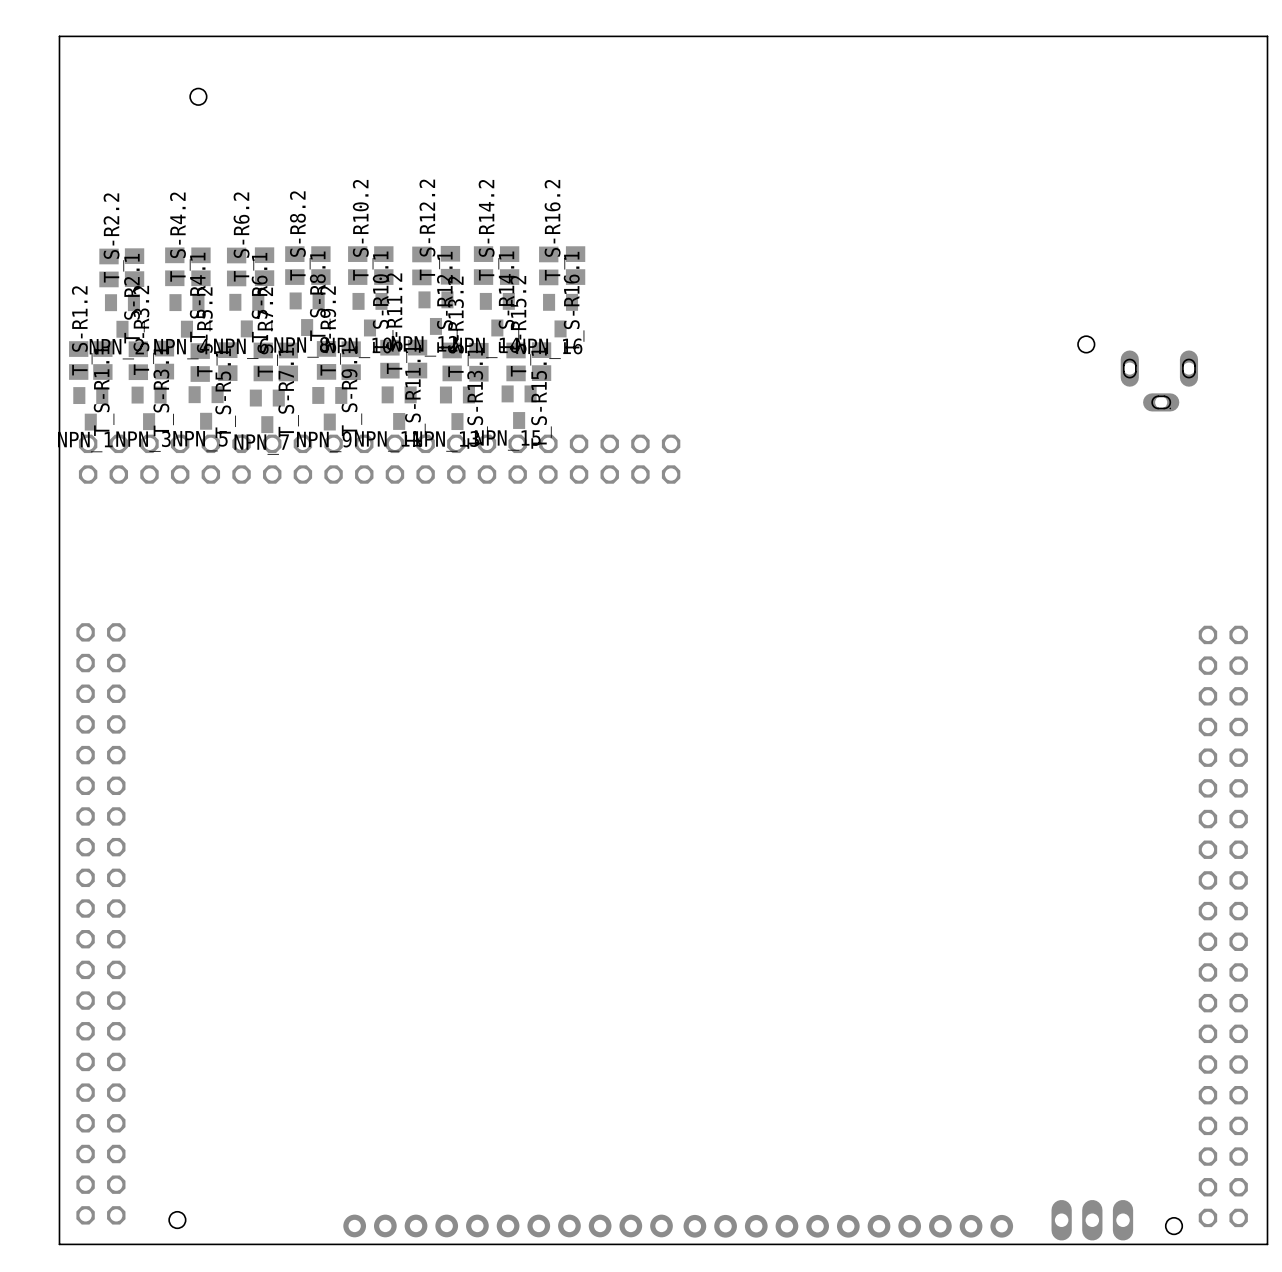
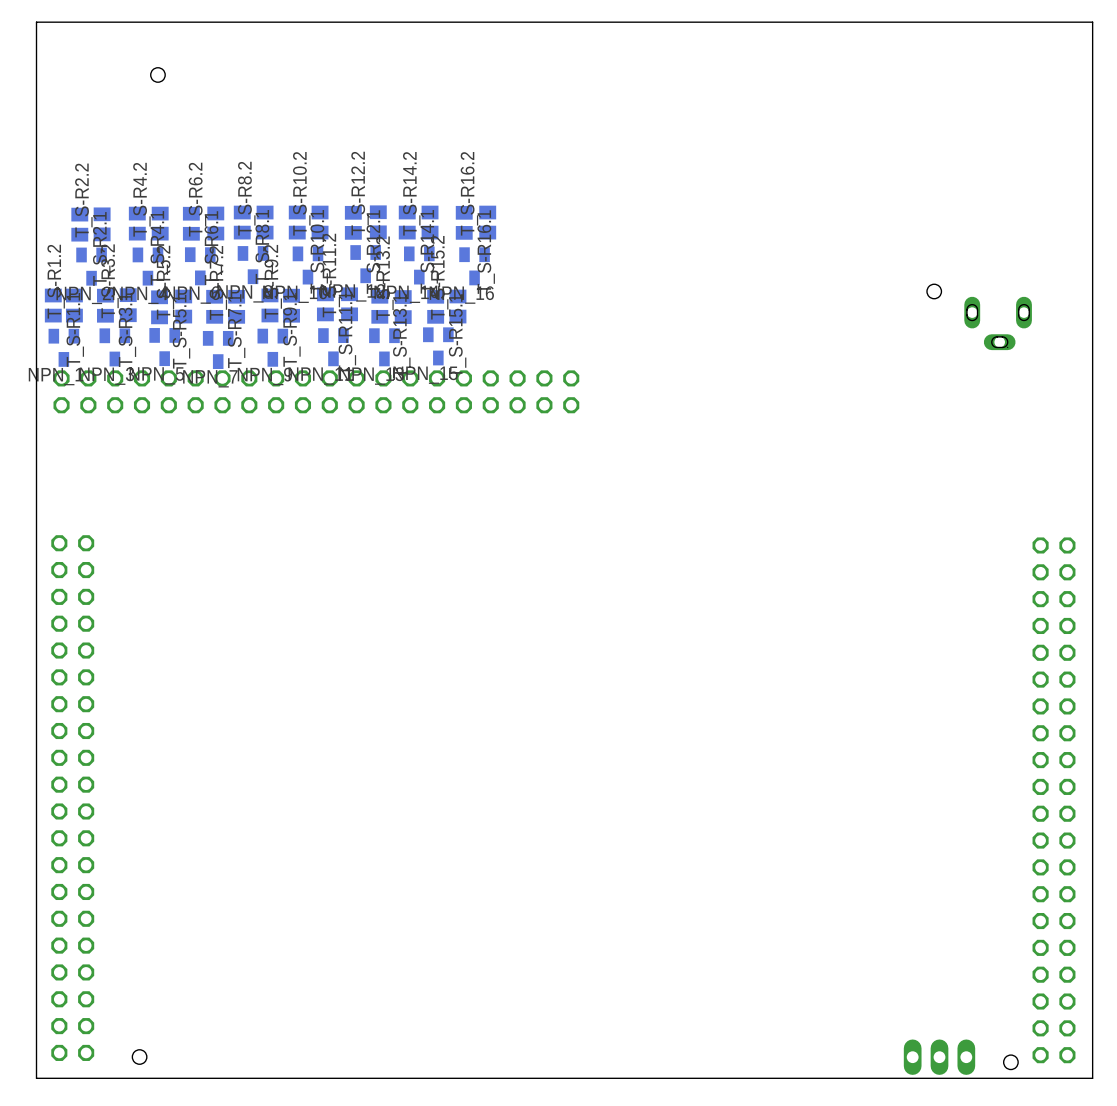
part: (508, 1225) -> none
part: (848, 1226) -> none

